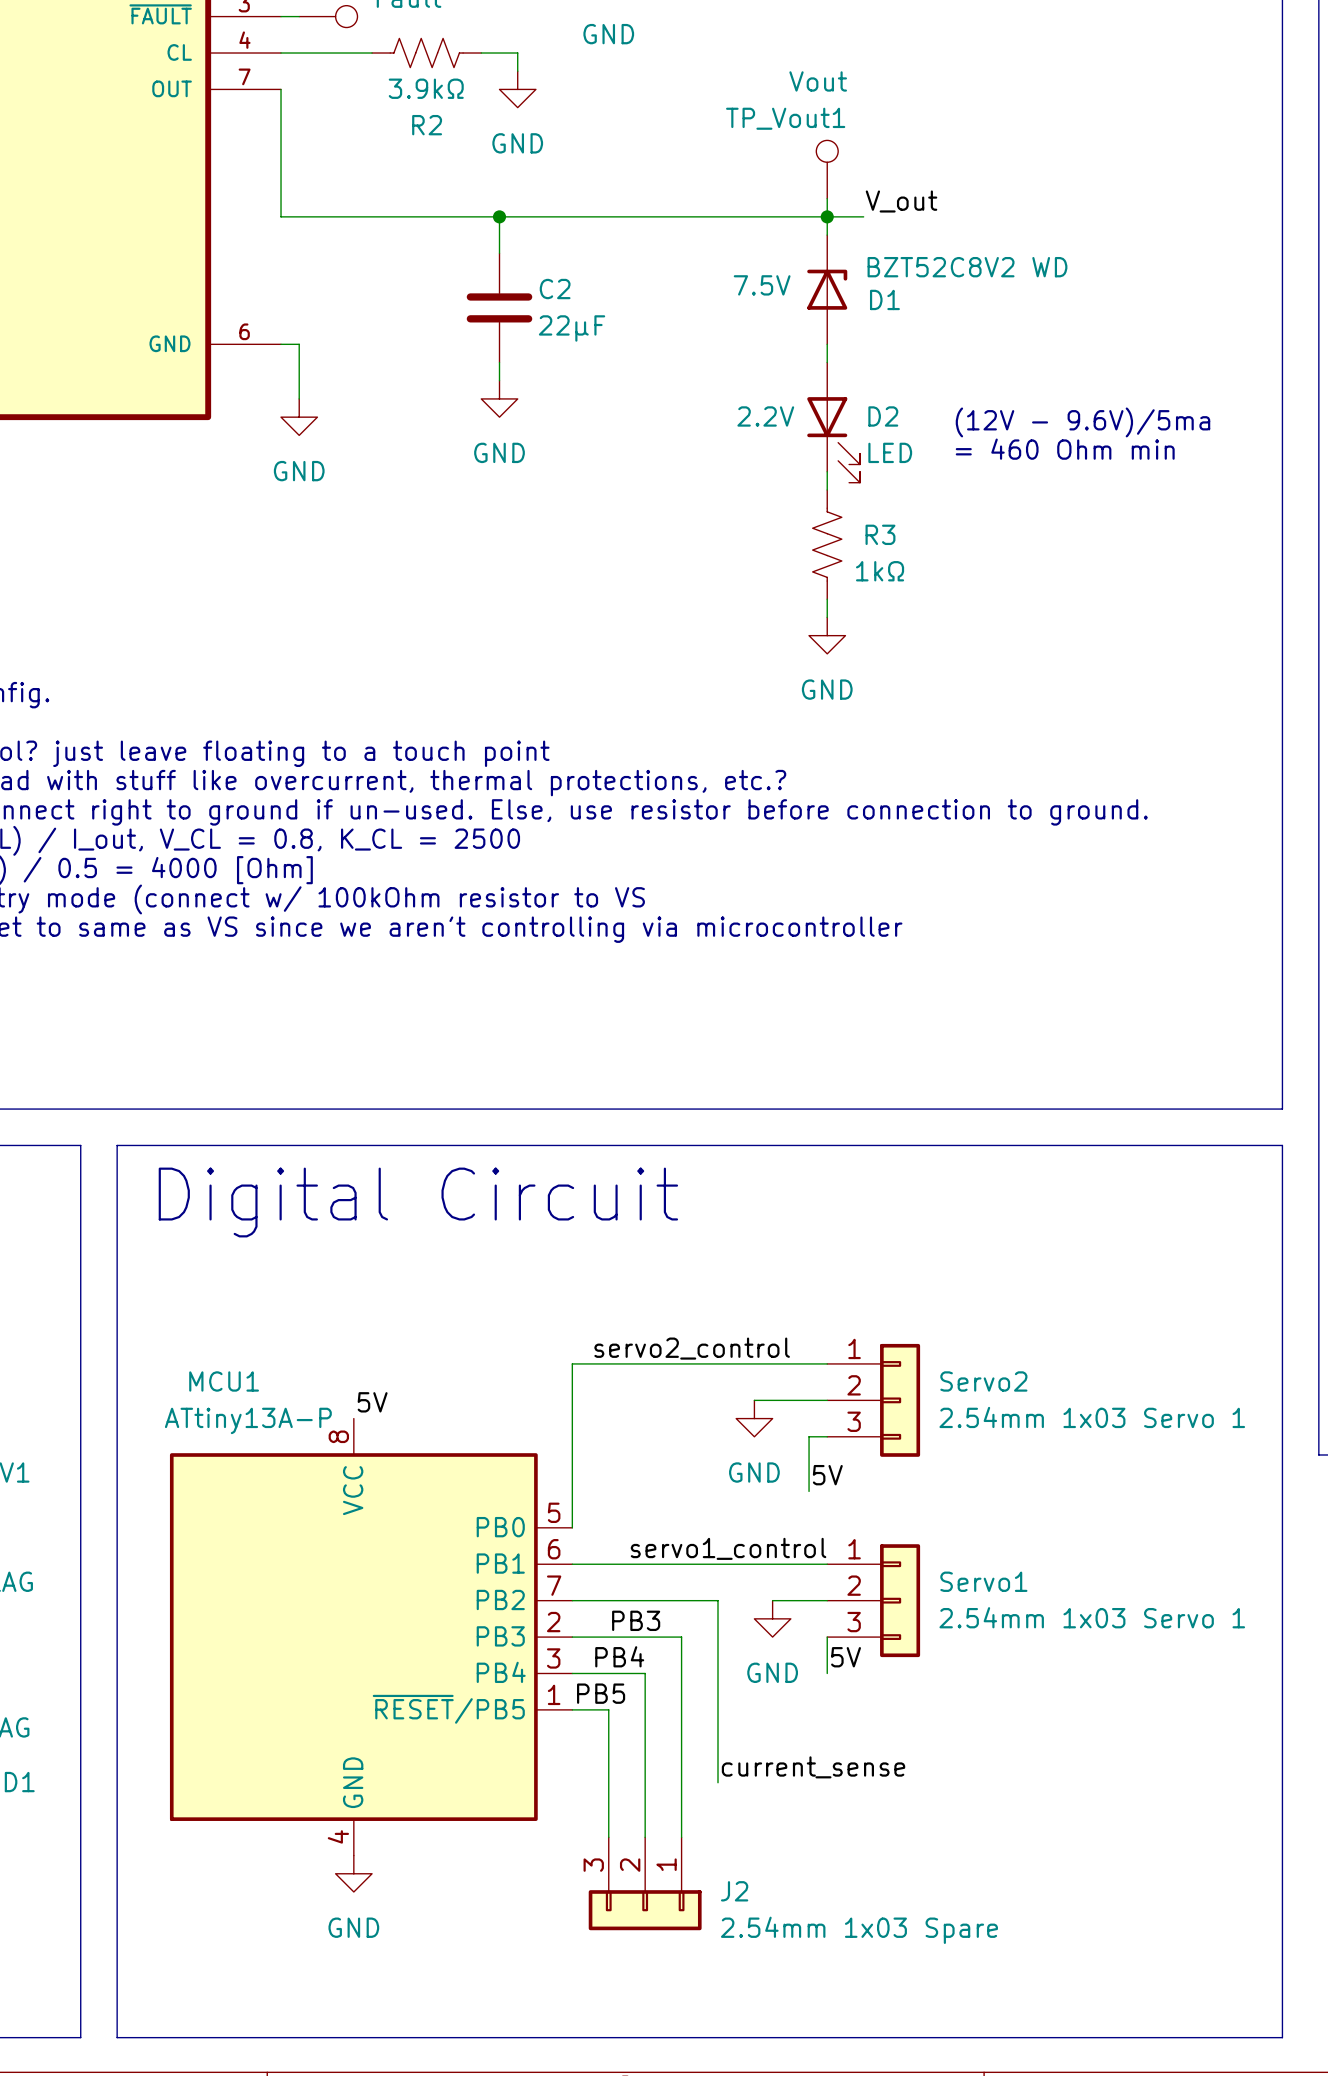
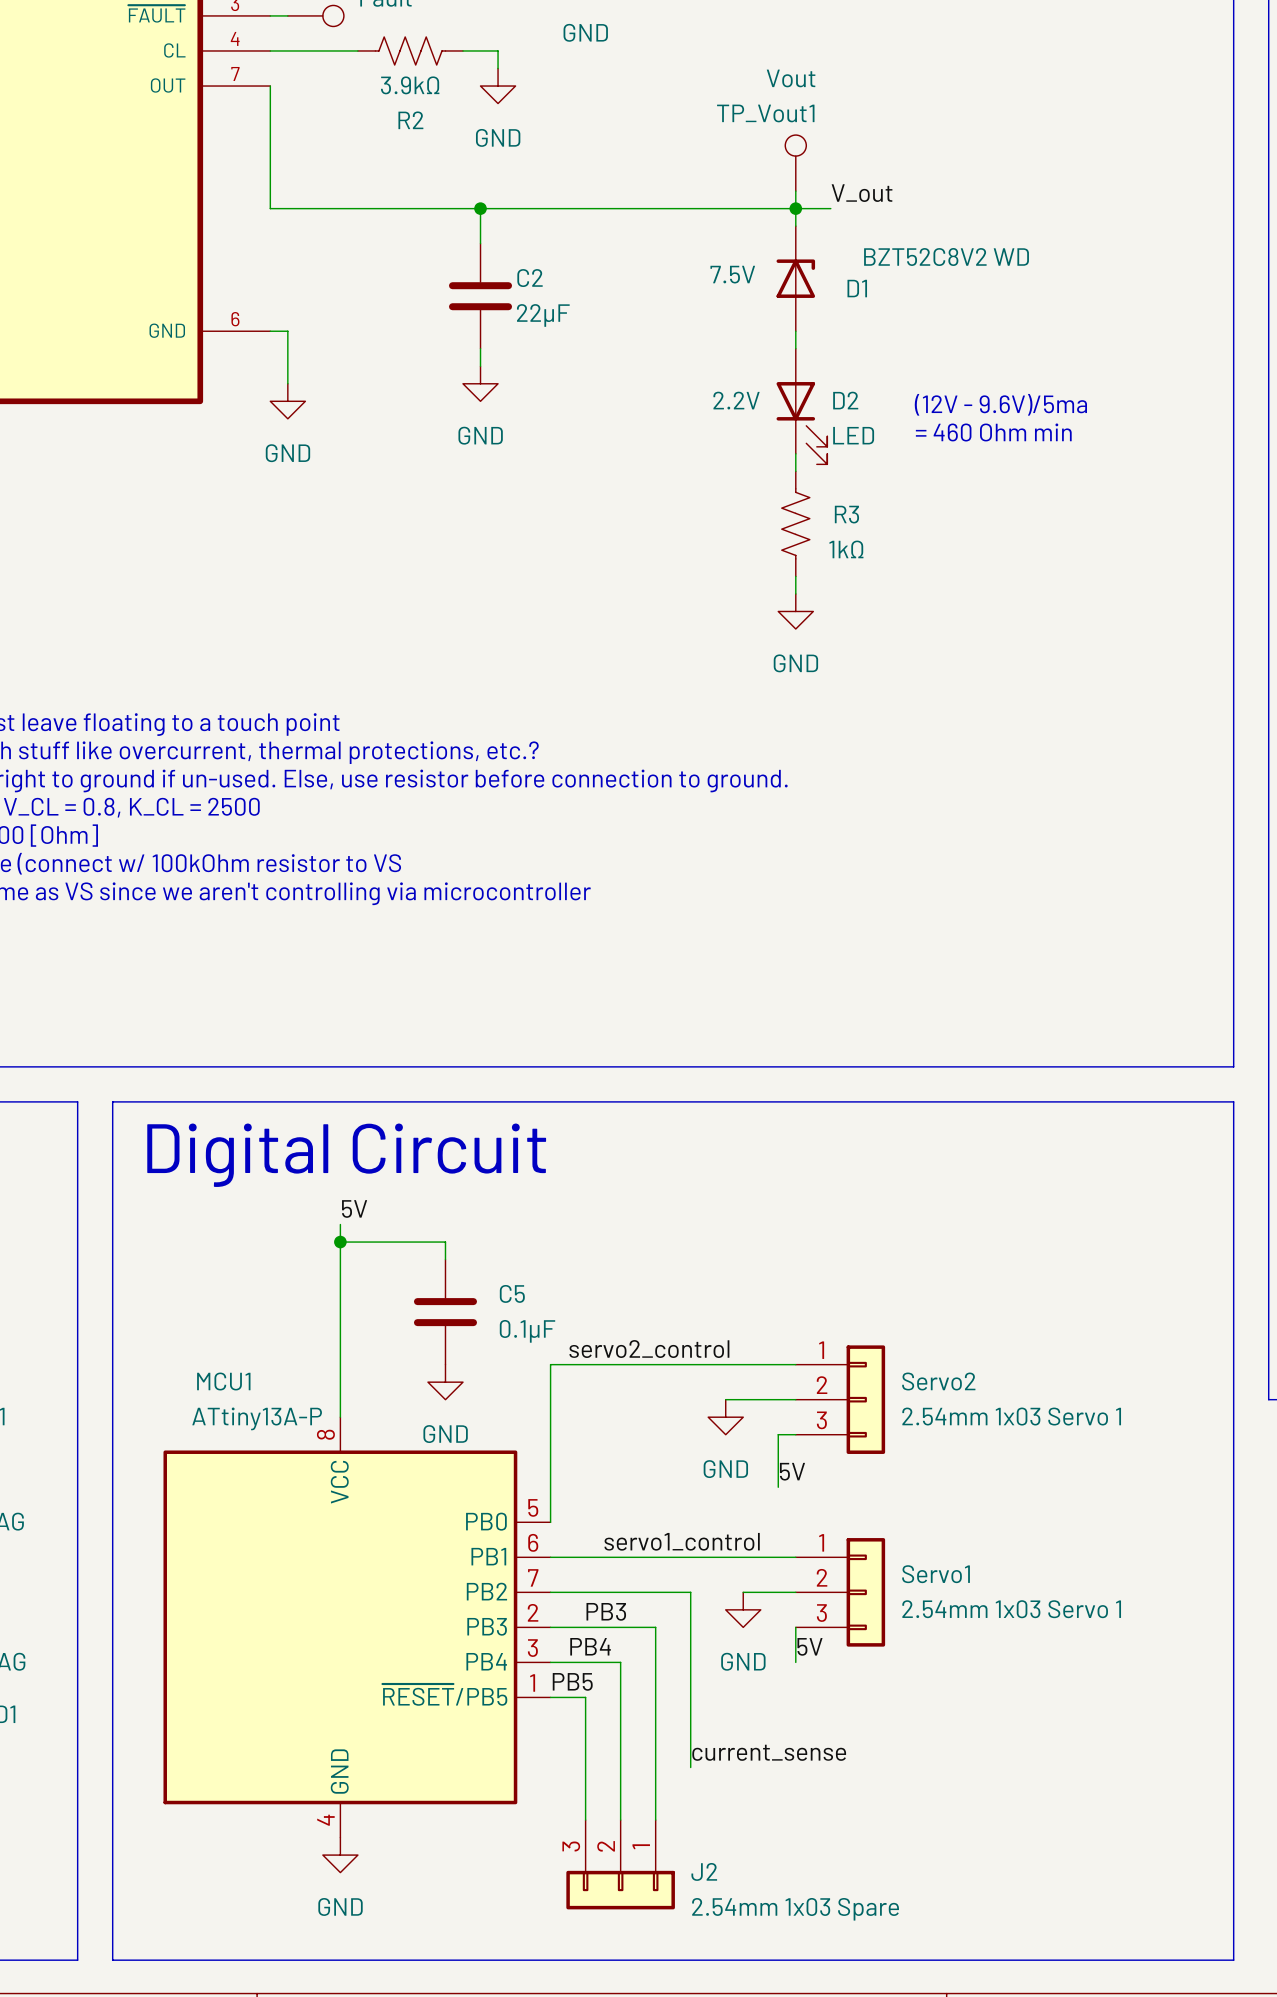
wire: none -> (340, 1224) (340, 1417)
wire: none -> (340, 1242) (445, 1242) (445, 1259)
junction: none -> (340, 1242)
label position: servo2_control (692, 1348) -> servo2_control (649, 1349)
C5: none -> 0.1µF (445, 1312)
wire: (827, 1363) (572, 1363) (572, 1418) -> (795, 1364) (550, 1364)
wire: (754, 1400) (827, 1400) -> (725, 1399) (795, 1399)
Servo2 position: (873, 1400) -> (840, 1399)
label position: 5V (372, 1402) -> 5V (354, 1208)
power symbol position: GND (754, 1418) -> GND (725, 1417)
power symbol: none -> GND (445, 1382)
wire: (827, 1436) (809, 1436) (809, 1491) -> (795, 1434) (778, 1434) (778, 1487)
label position: 5V (827, 1475) -> 5V (792, 1471)
wire: none -> (550, 1469) (550, 1522)
label position: servo1_control (728, 1548) -> servo1_control (682, 1541)
wire: (572, 1564) (827, 1564) -> (550, 1557) (795, 1557)
wire: (572, 1600) (717, 1600) (717, 1655) -> (550, 1592) (690, 1592)
wire: (772, 1600) (827, 1600) -> (743, 1592) (795, 1592)
Servo1 position: (873, 1600) -> (840, 1592)
power symbol position: GND (772, 1618) -> GND (743, 1609)
label position: PB3 (636, 1620) -> PB3 (606, 1611)
MCU1 position: (371, 1637) -> (357, 1627)
wire: (572, 1637) (681, 1637) (681, 1691) -> (550, 1627) (655, 1627)
wire: (827, 1637) (827, 1673) -> (795, 1627) (795, 1662)
label position: PB4 (619, 1656) -> PB4 (590, 1646)
label position: 5V (846, 1657) -> 5V (810, 1646)
wire: (572, 1673) (645, 1673) (645, 1728) -> (550, 1662) (620, 1662)
label position: PB5 (601, 1693) -> PB5 (572, 1681)
wire: (572, 1709) (608, 1709) (608, 1764) -> (550, 1697) (585, 1697)
label position: current_sense (813, 1767) -> current_sense (769, 1752)
wire: none -> (690, 1714) (690, 1767)
power symbol position: GND (353, 1873) -> GND (340, 1855)
J2 position: (645, 1883) -> (620, 1864)

